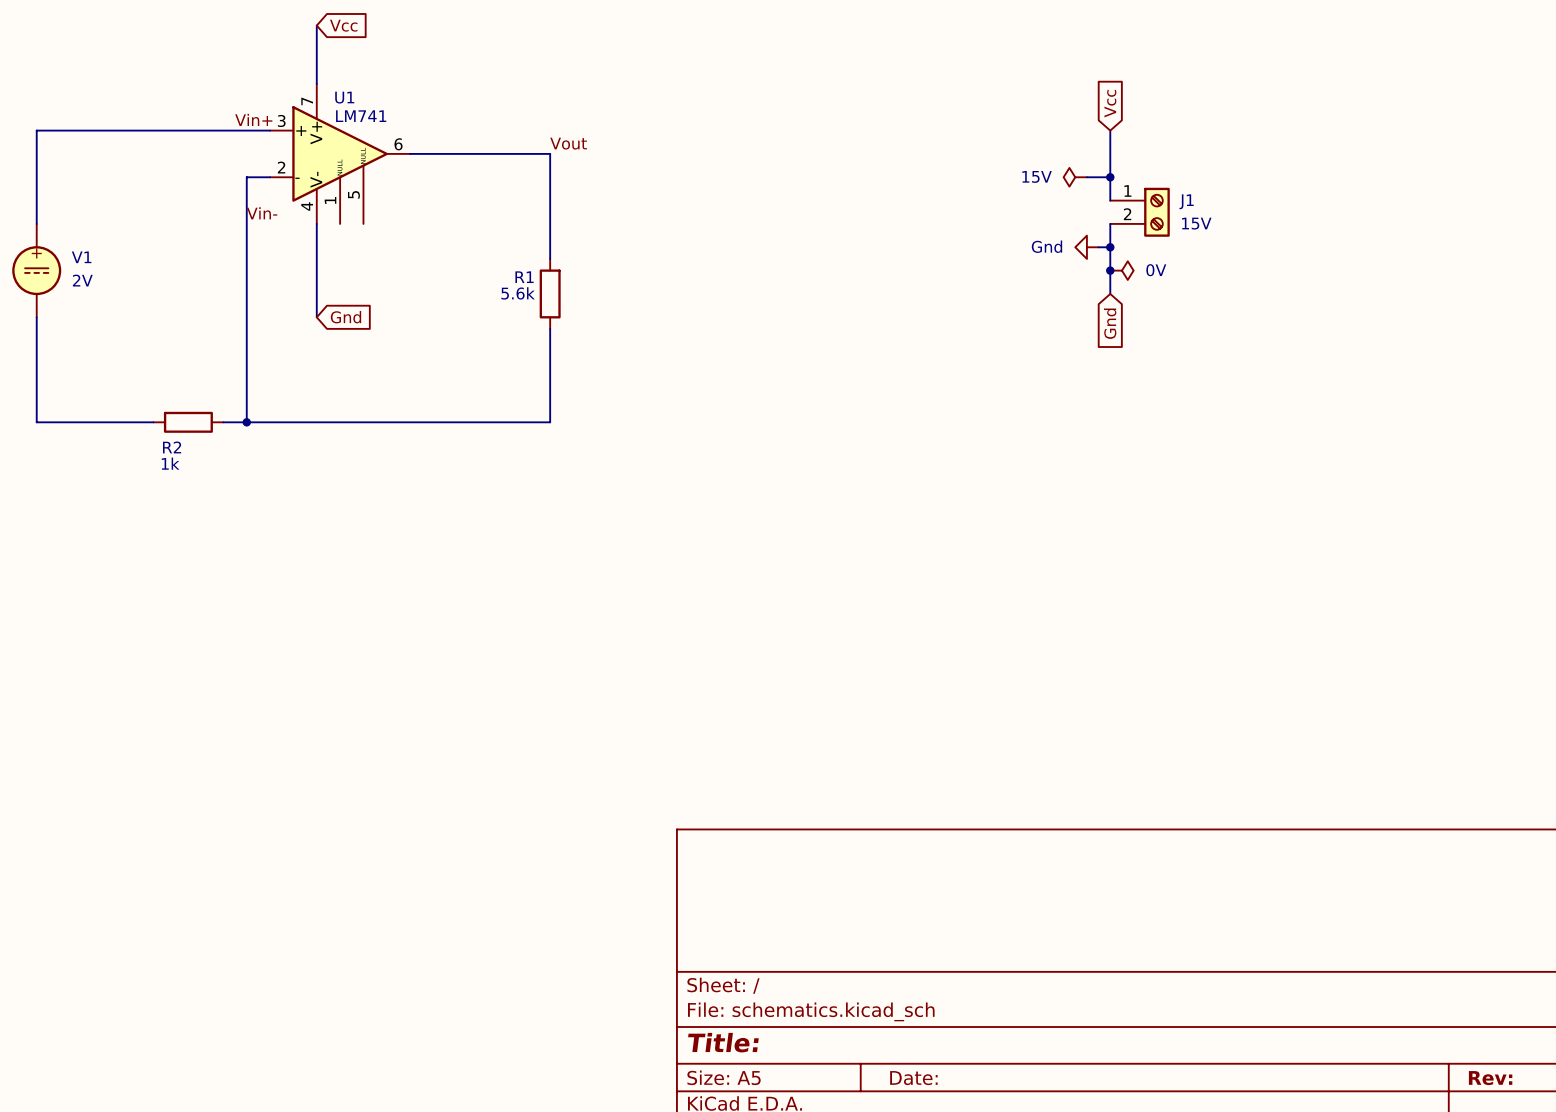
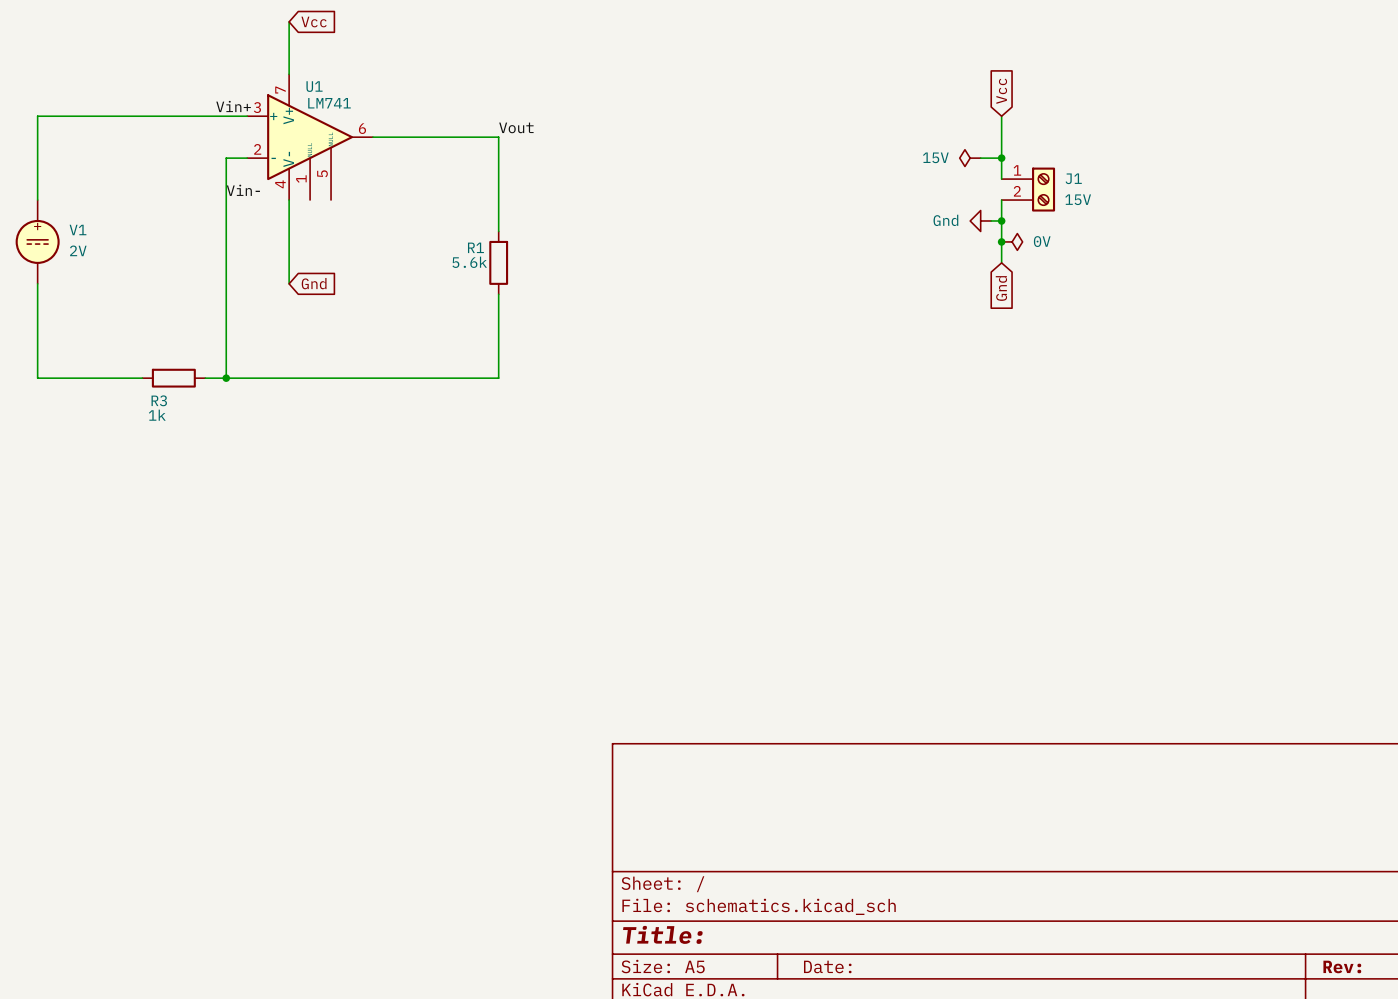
R2 name: R2 (172, 447) -> R3 (159, 400)

